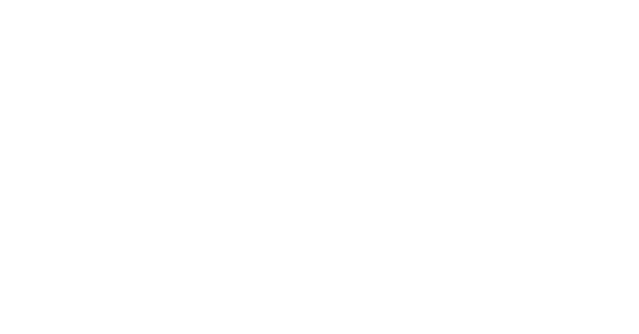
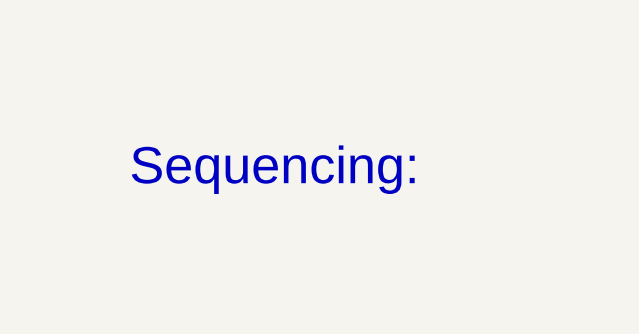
text: none -> Sequencing: (273, 169)

